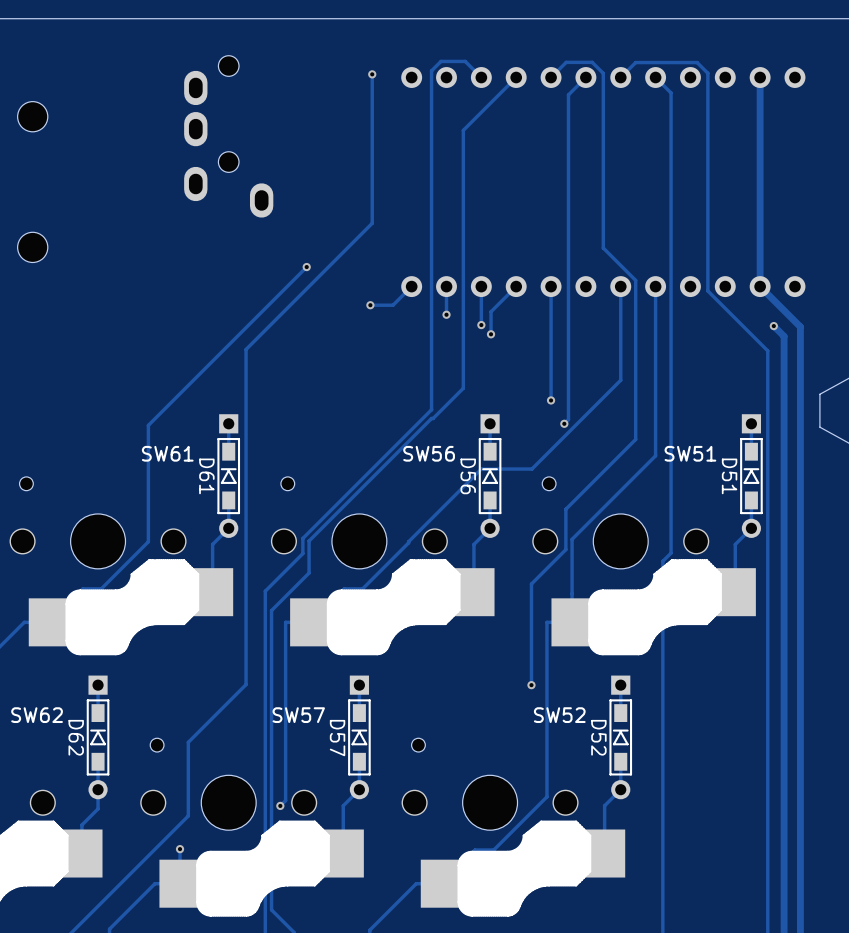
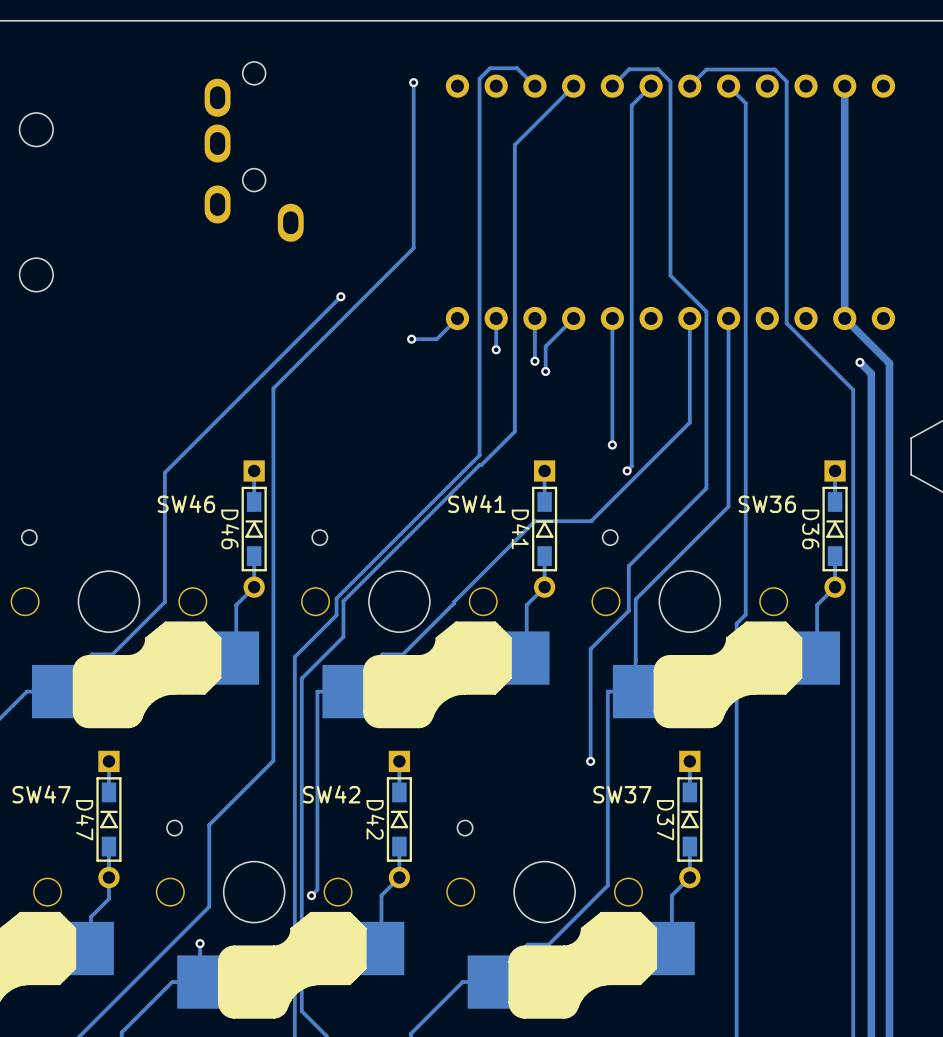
SW61 name: SW61 (167, 453) -> SW46 (186, 503)
SW56 name: SW56 (429, 453) -> SW41 (476, 503)
SW51 name: SW51 (690, 453) -> SW36 (767, 504)
D61 name: D61 (206, 476) -> D46 (230, 529)
D56 name: D56 (468, 476) -> D41 (520, 529)
D51 name: D51 (729, 476) -> D36 (810, 529)
SW62 name: SW62 (37, 715) -> SW47 (41, 794)
SW57 name: SW57 (298, 715) -> SW42 (331, 794)
SW52 name: SW52 (559, 715) -> SW37 (622, 794)
D62 name: D62 (76, 737) -> D47 (85, 820)
D52 name: D52 (598, 737) -> D37 (665, 820)
D57 name: D57 (337, 738) -> D42 (375, 819)

